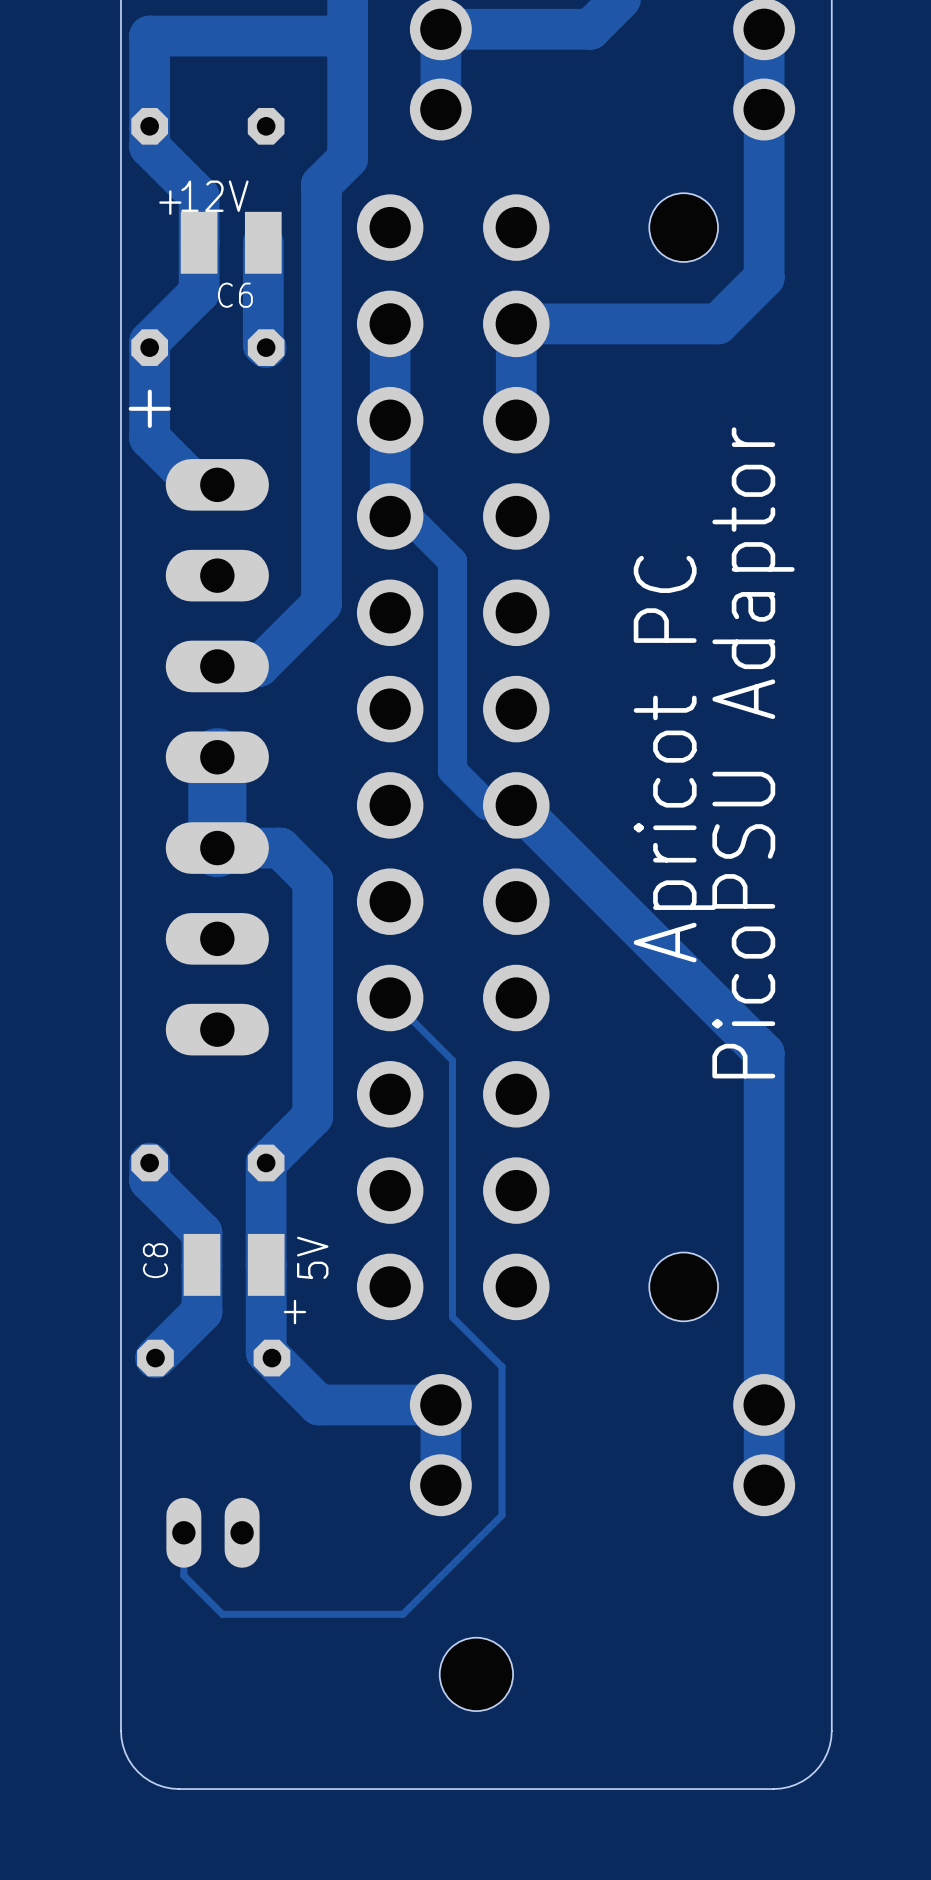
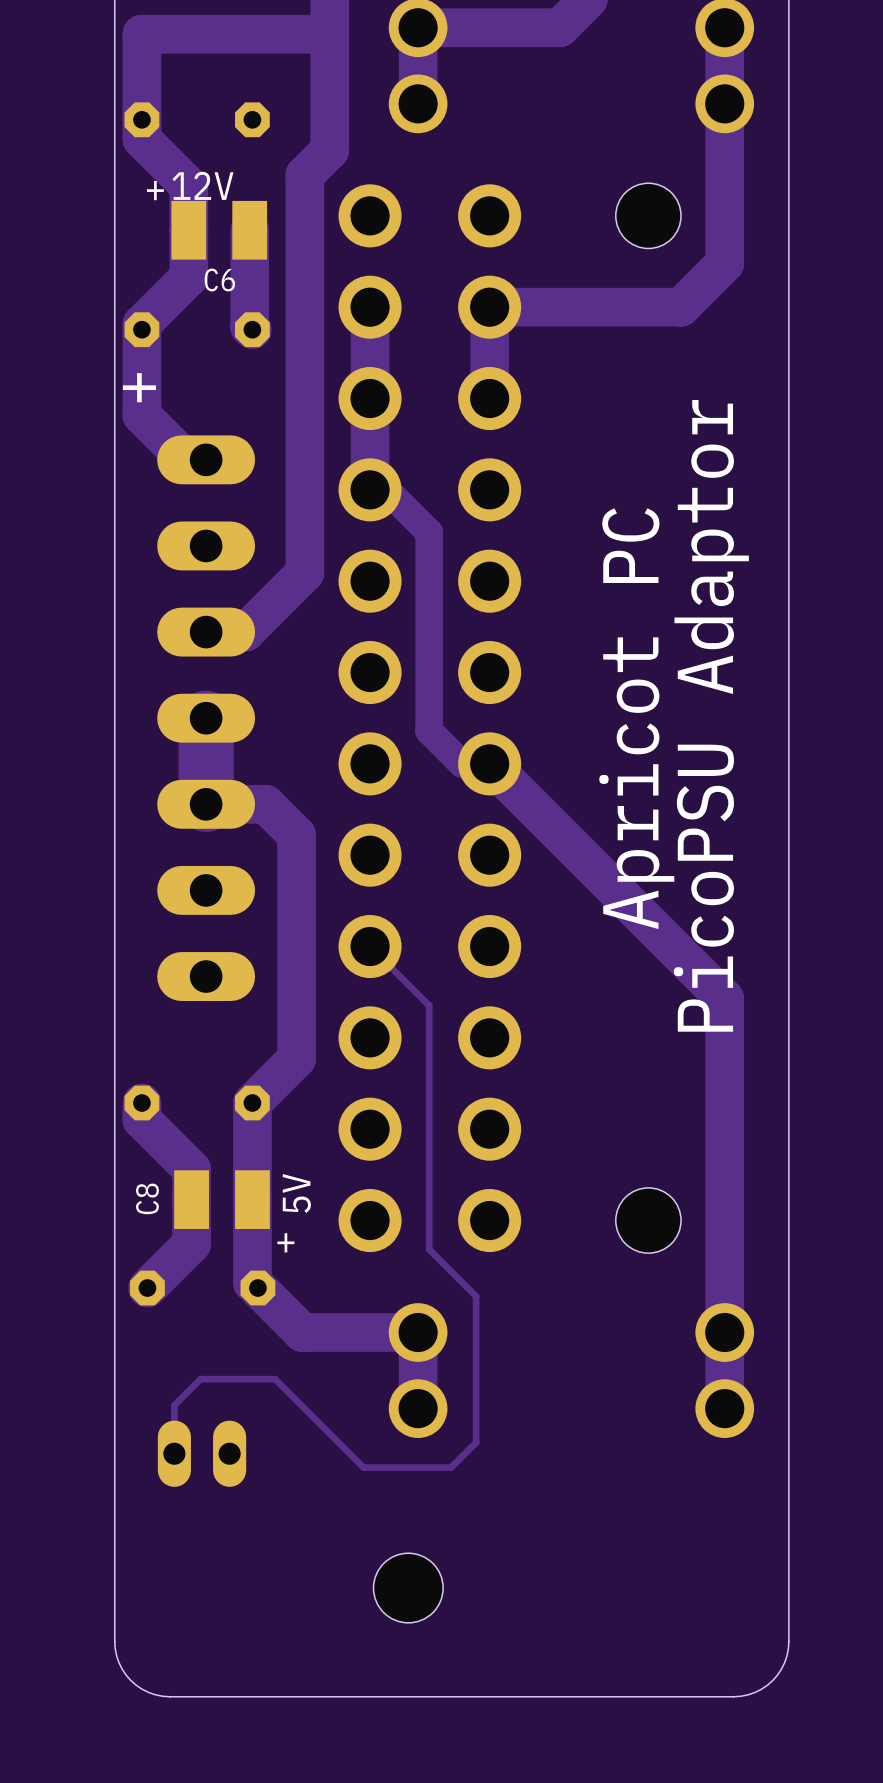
track: (502, 1515) (403, 1614) (222, 1614) (183, 1575) (183, 1532) -> (476, 1437) (476, 1442) (451, 1467) (363, 1467) (275, 1379) (200, 1379) (174, 1405) (174, 1453)
part position: (476, 1674) -> (408, 1588)

